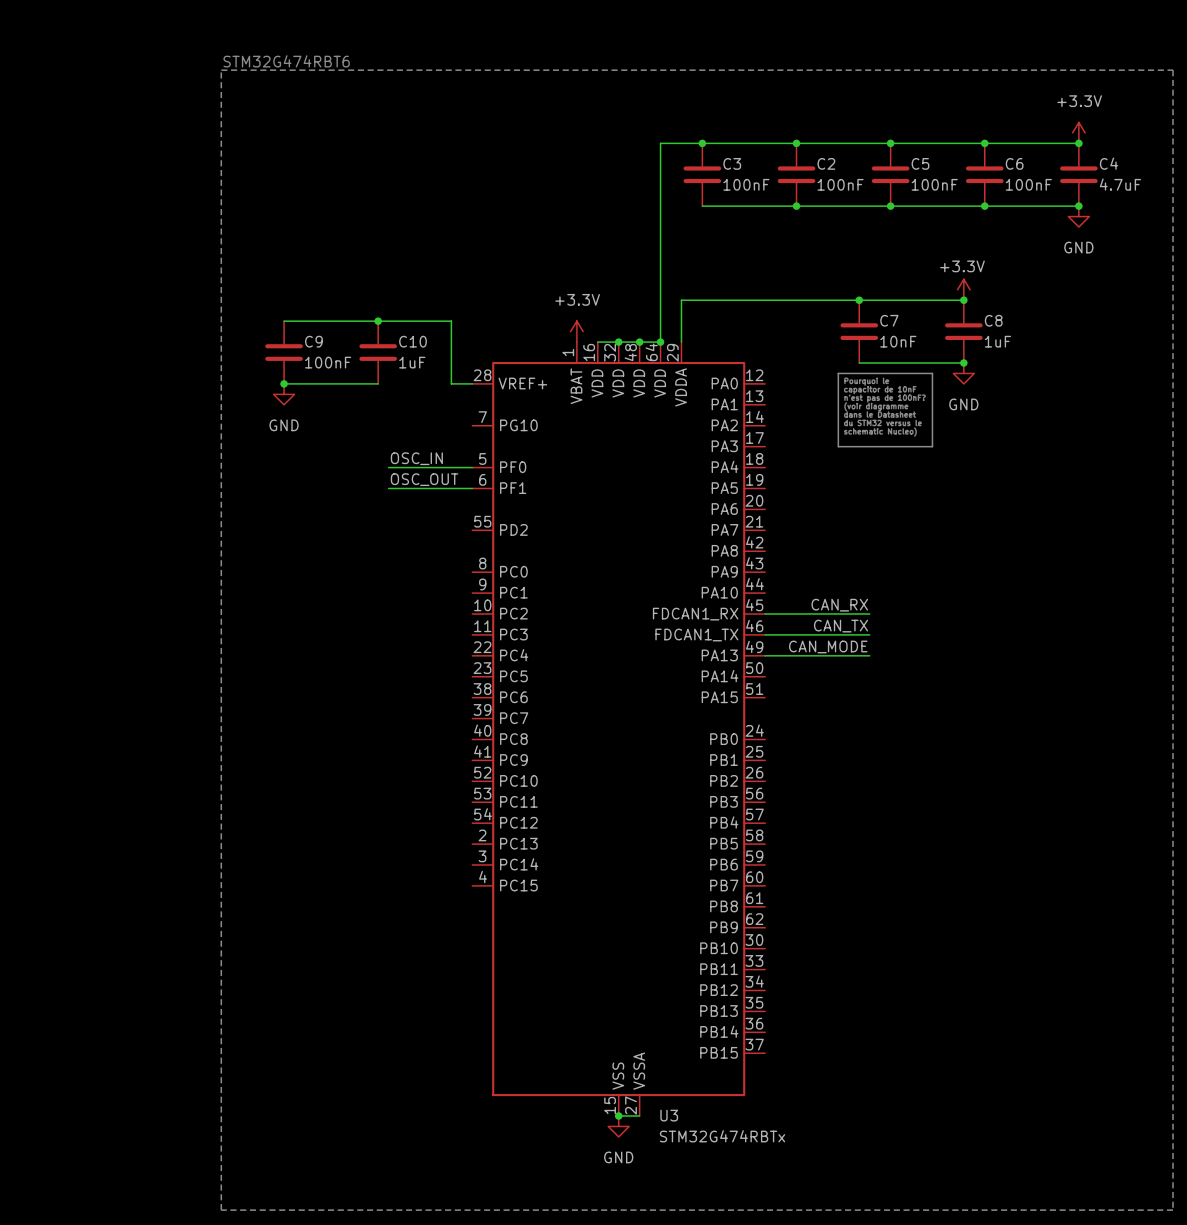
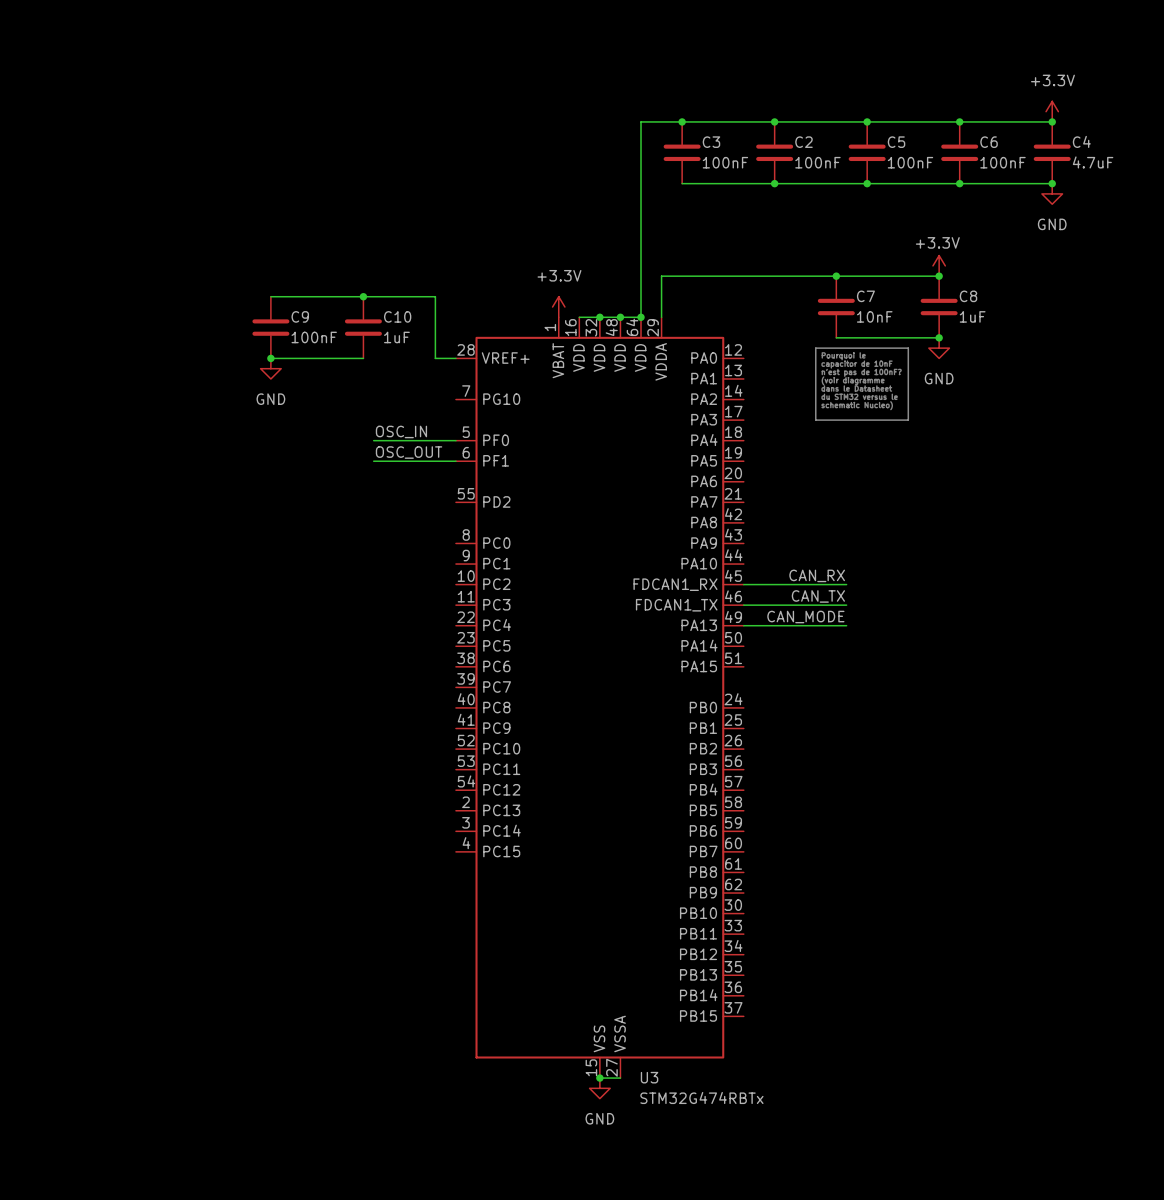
text: STM32G474RBT6 (286, 61) -> none
line: (221, 70) (1173, 70) (1173, 1210) (221, 1210) (221, 70) -> none

